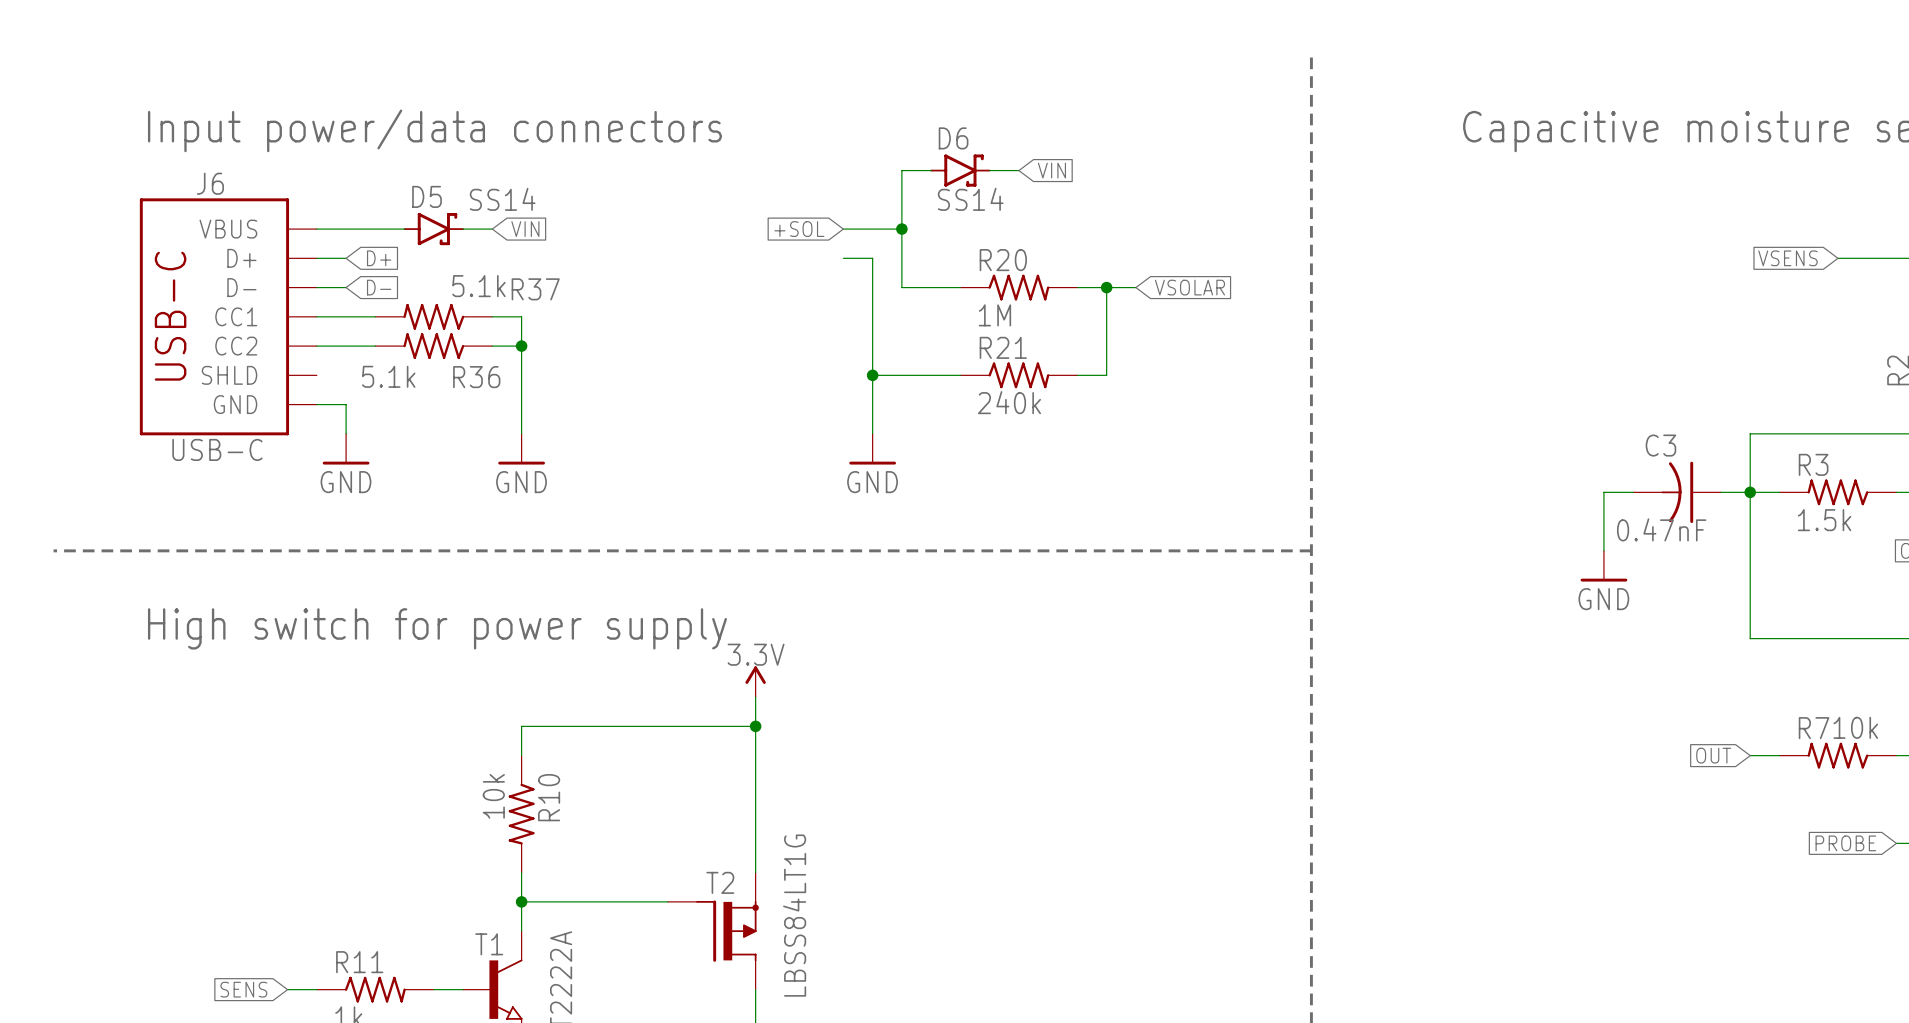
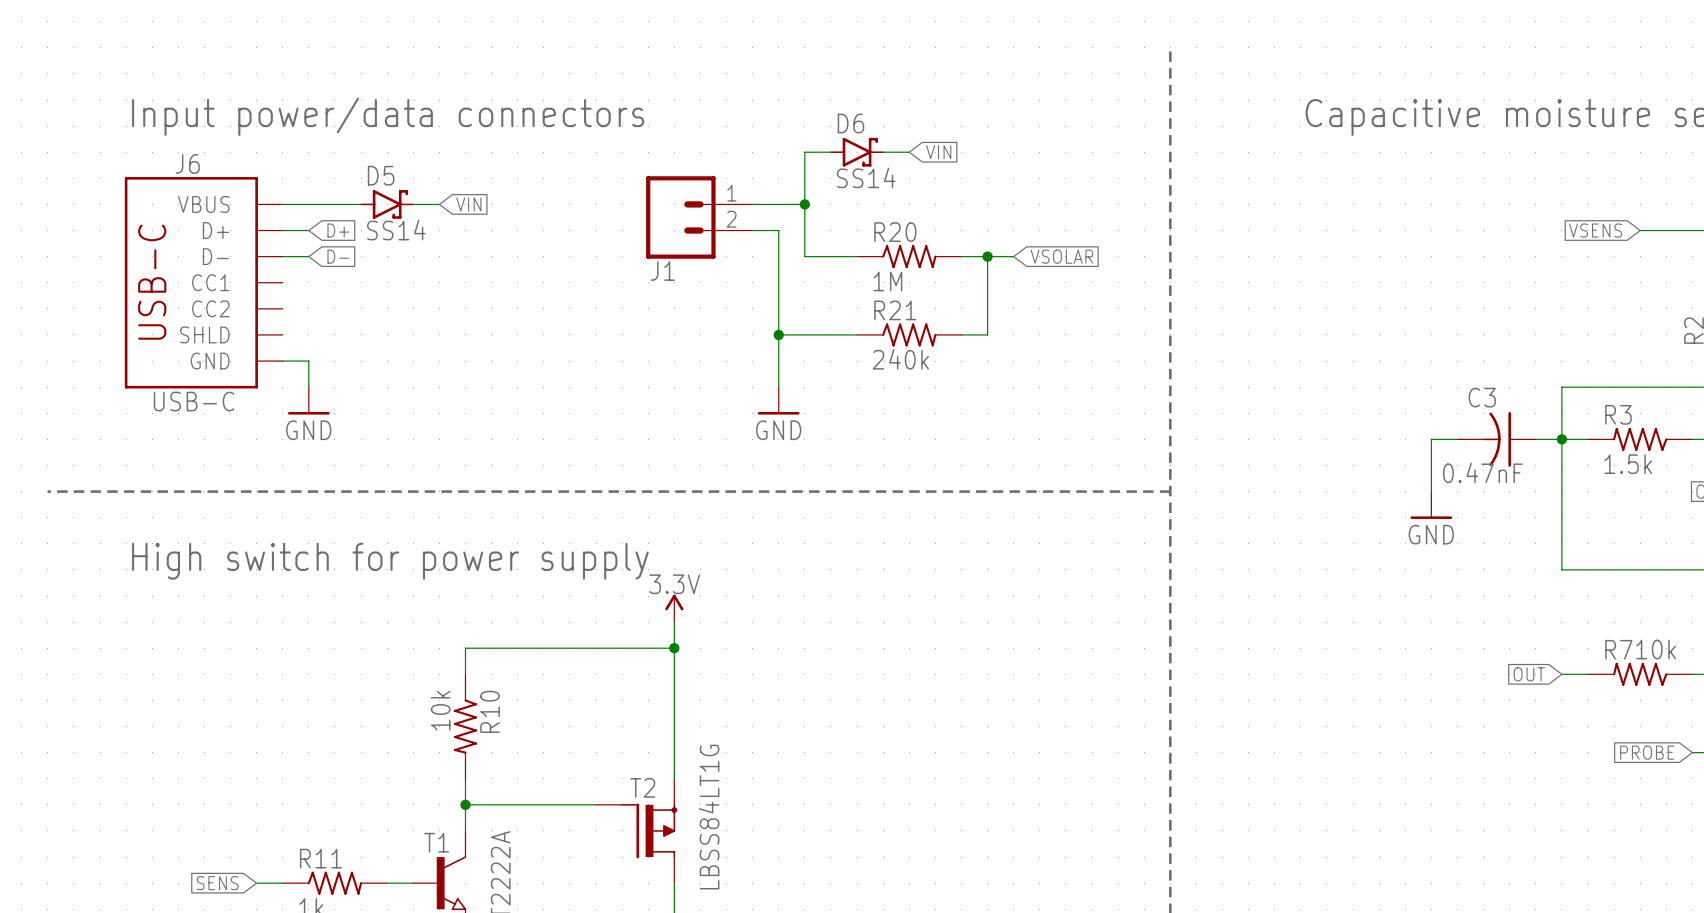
D5 value position: SS14 (502, 199) -> SS14 (396, 230)
global label: +SOL (799, 229) -> none
J1: none -> (699, 217)
wire: (316, 316) (375, 316) -> none
R37: 5.1k (433, 316) -> none
wire: (492, 316) (521, 316) (521, 433) -> none
wire: (316, 346) (375, 346) -> none
R36: 5.1k (433, 346) -> none
wire: (492, 346) (521, 346) -> none
junction: (521, 346) -> none
power symbol: GND (521, 449) -> none

